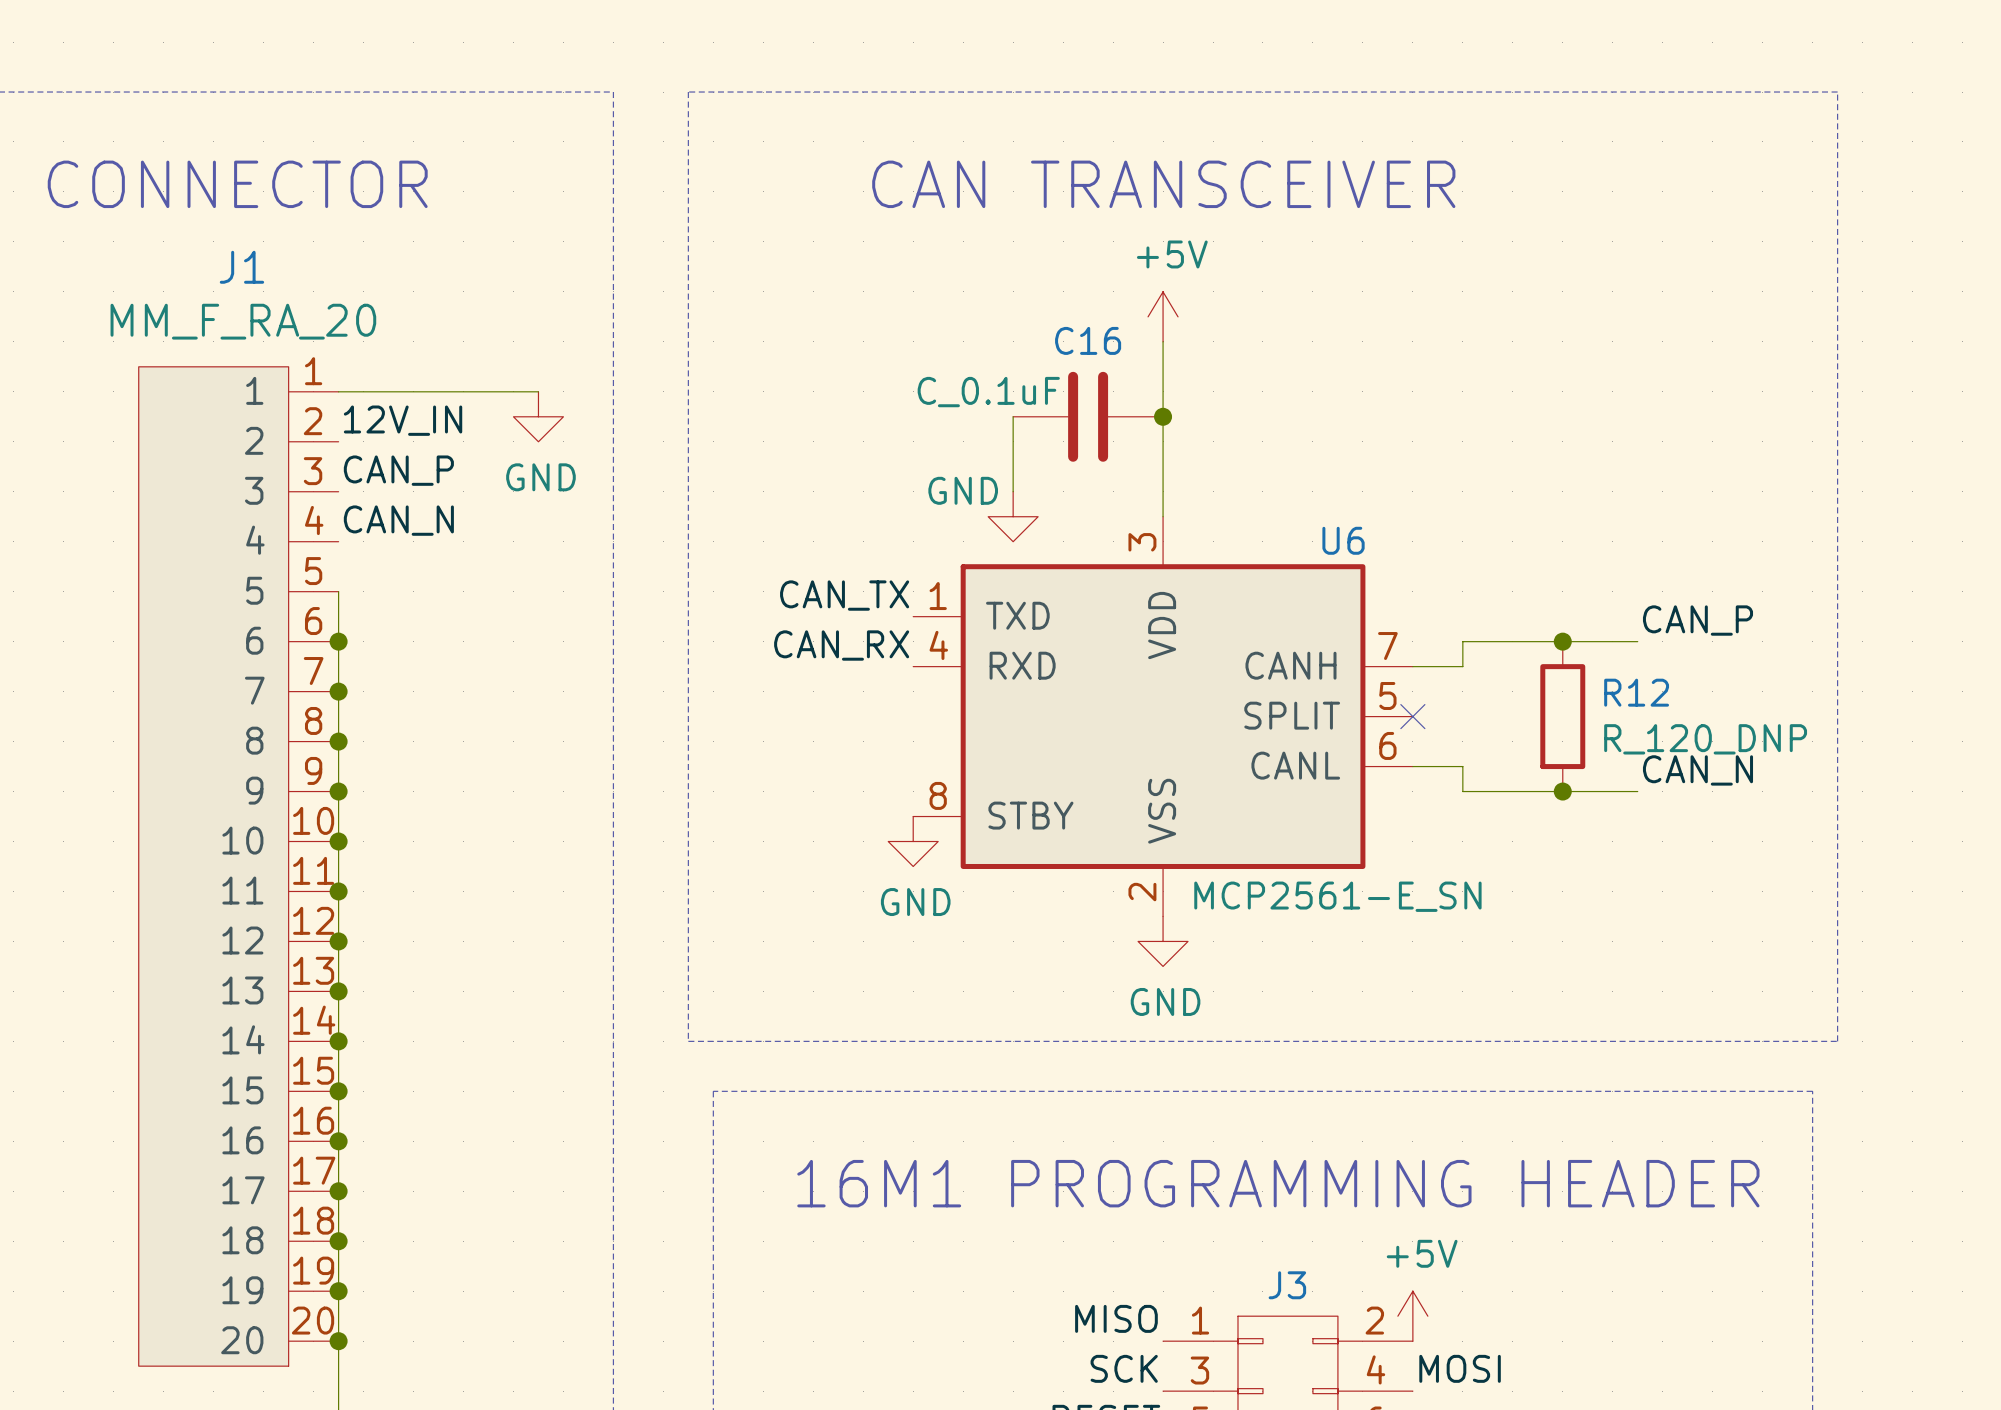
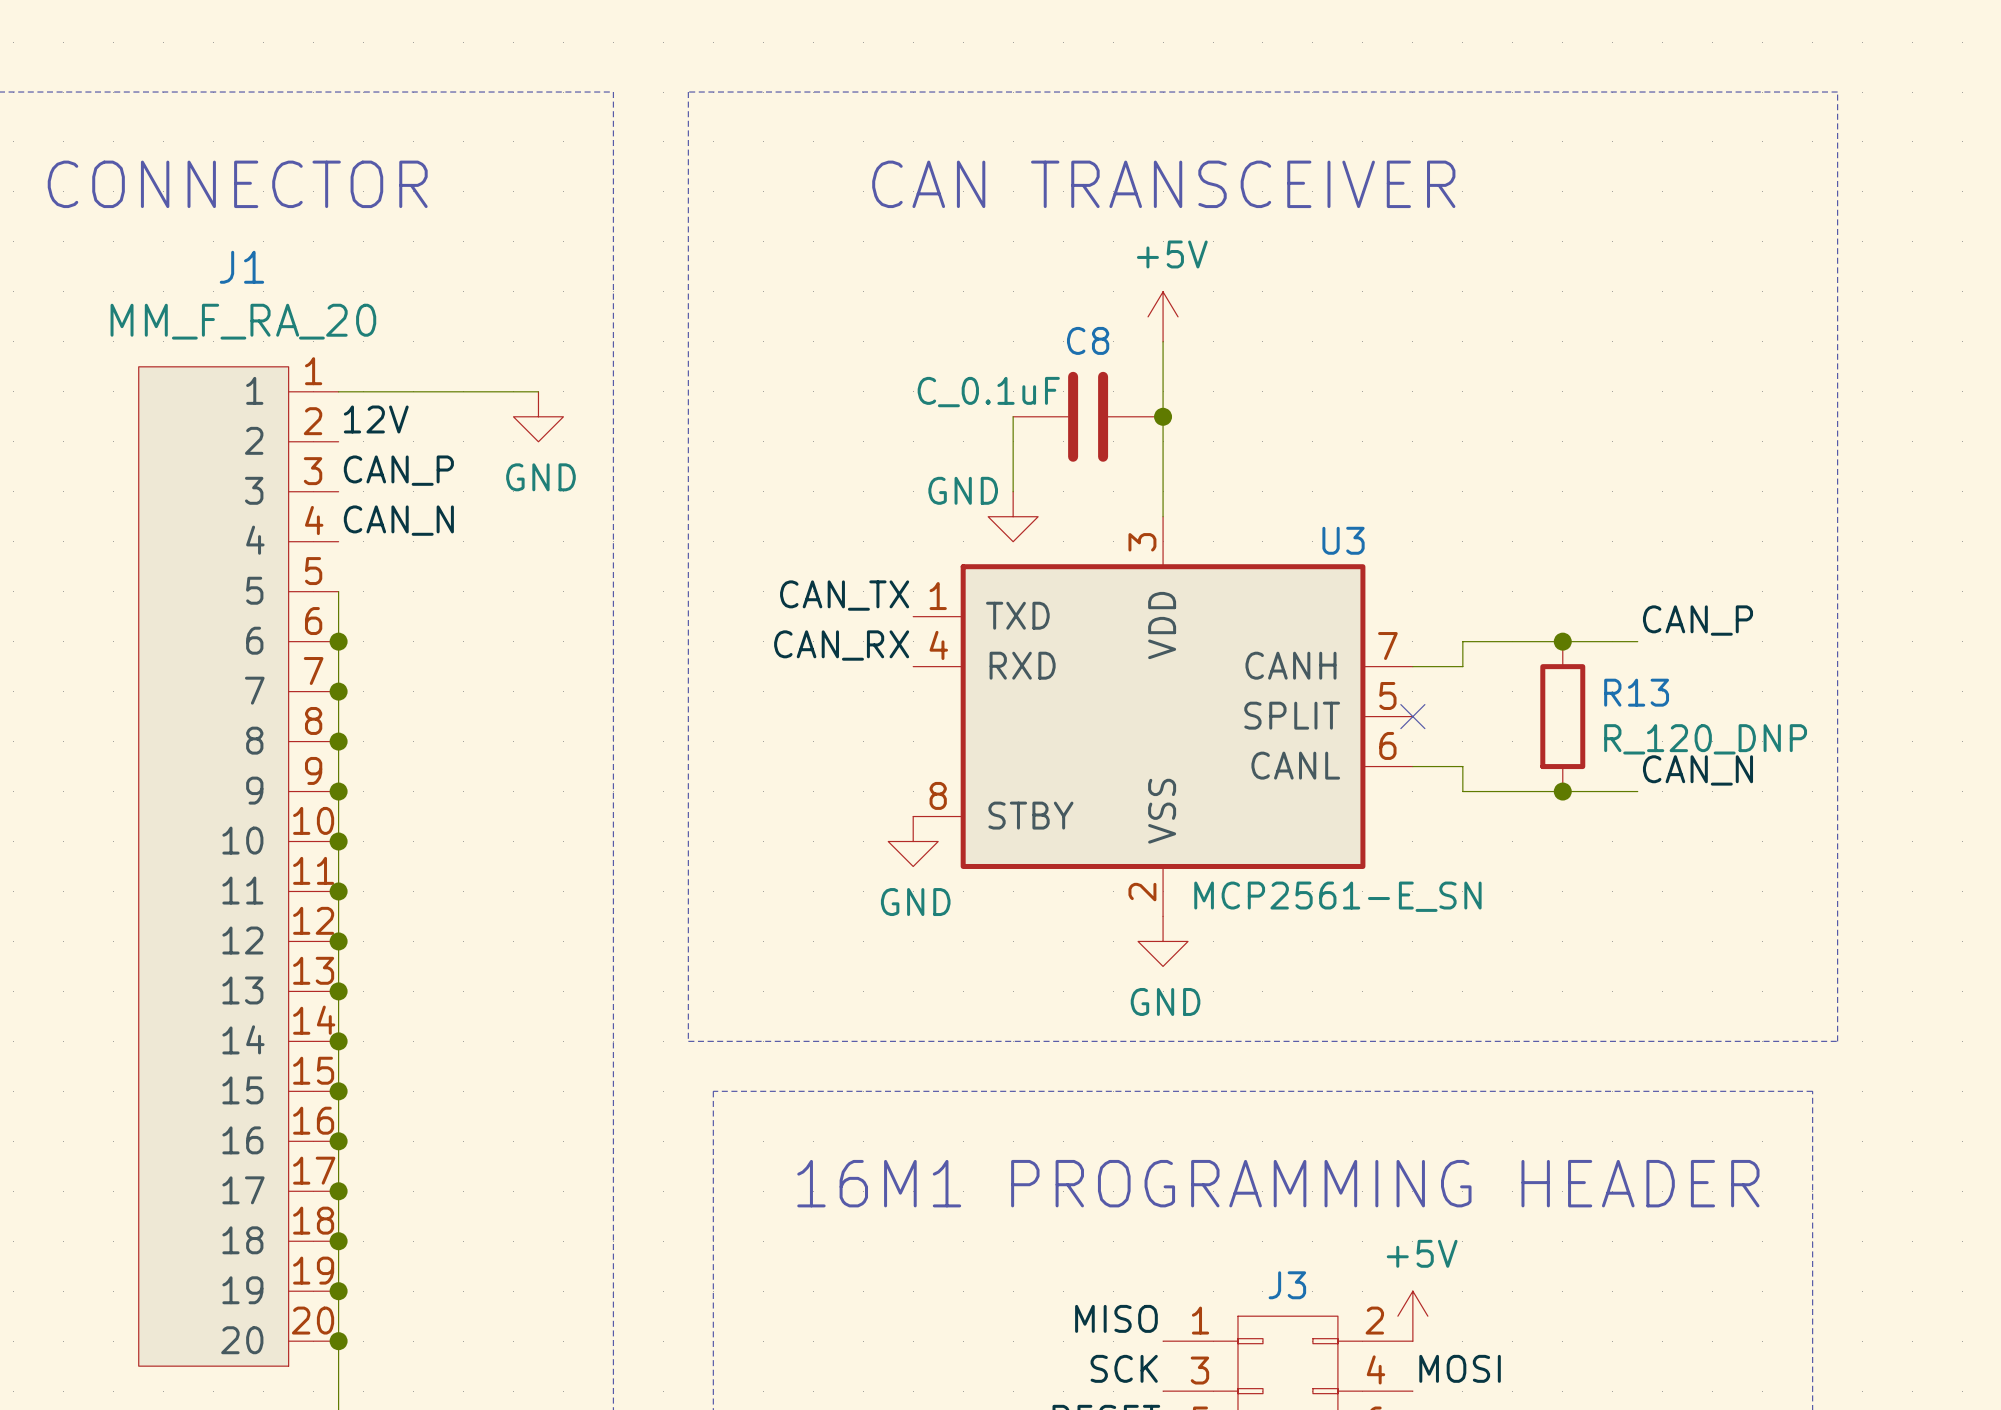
C16 name: C16 (1088, 340) -> C8 (1088, 340)
label: 12V_IN (403, 420) -> 12V (376, 419)
U6 name: U6 (1343, 540) -> U3 (1343, 540)
R12 name: R12 (1636, 692) -> R13 (1636, 692)

